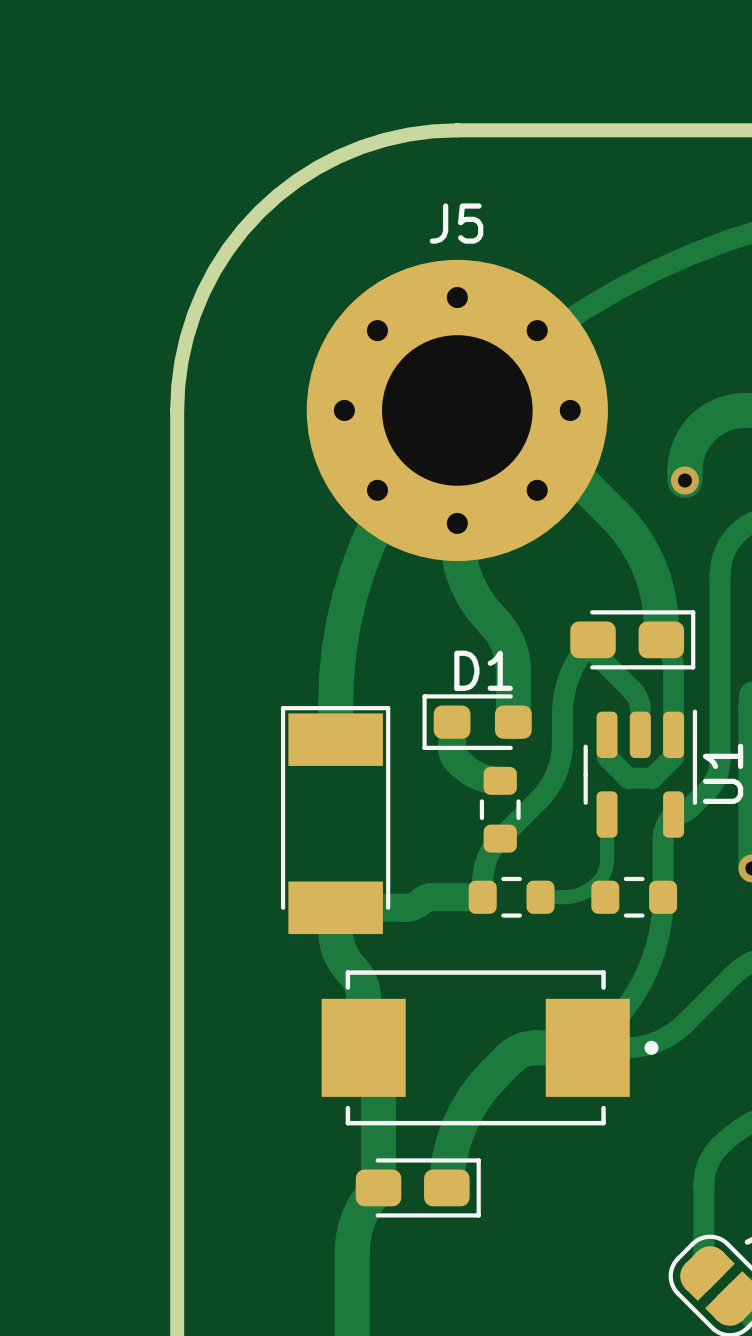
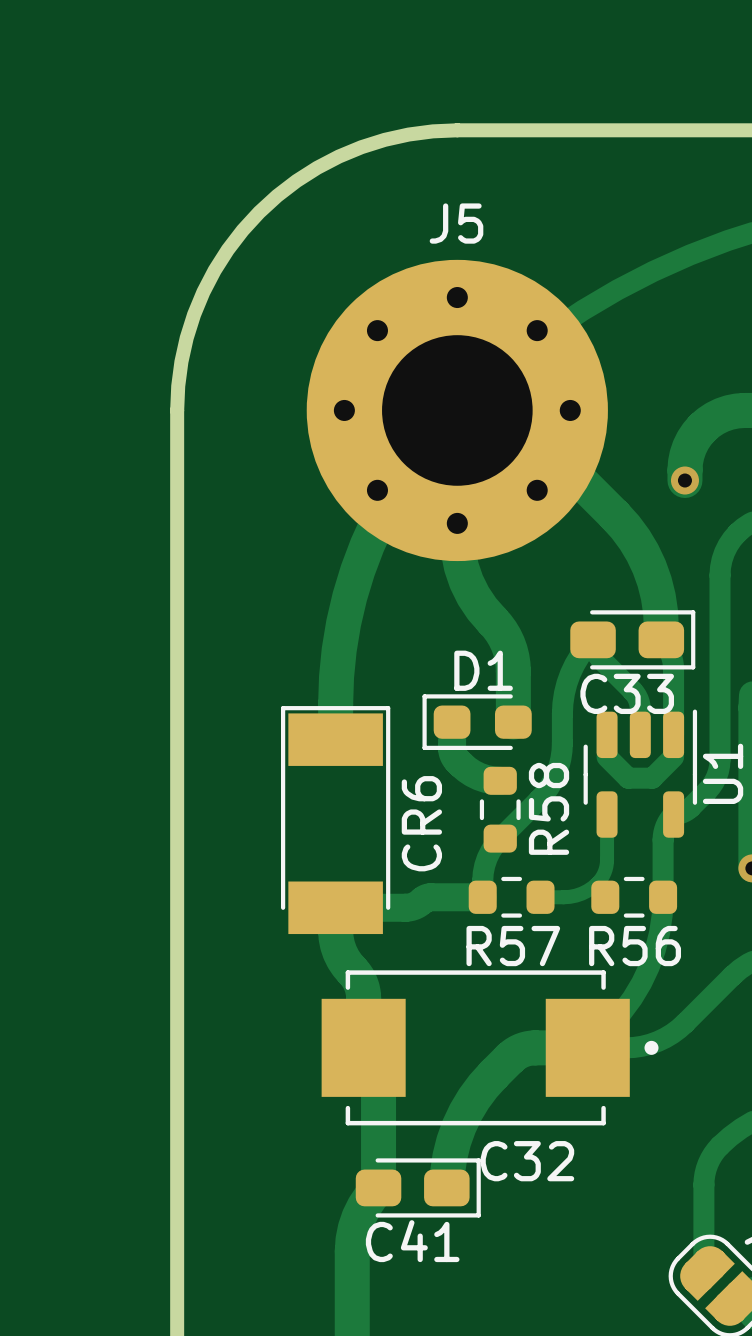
C33 name: none -> C33 (627, 693)
R58 name: none -> R58 (549, 808)
CR6 name: none -> CR6 (421, 823)
R57 name: none -> R57 (513, 946)
R56 name: none -> R56 (635, 946)
C32 name: none -> C32 (527, 1161)
C41 name: none -> C41 (412, 1241)

